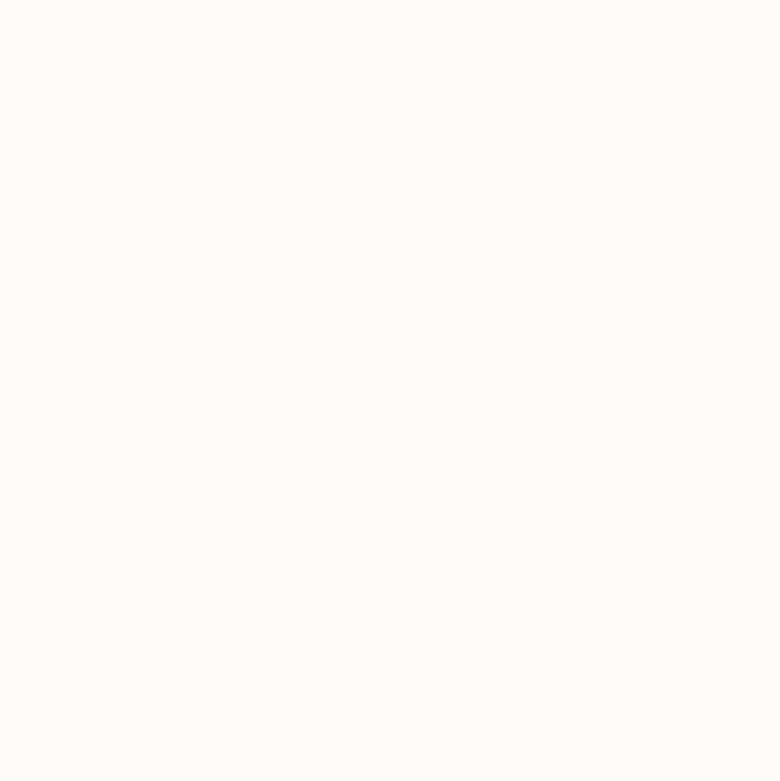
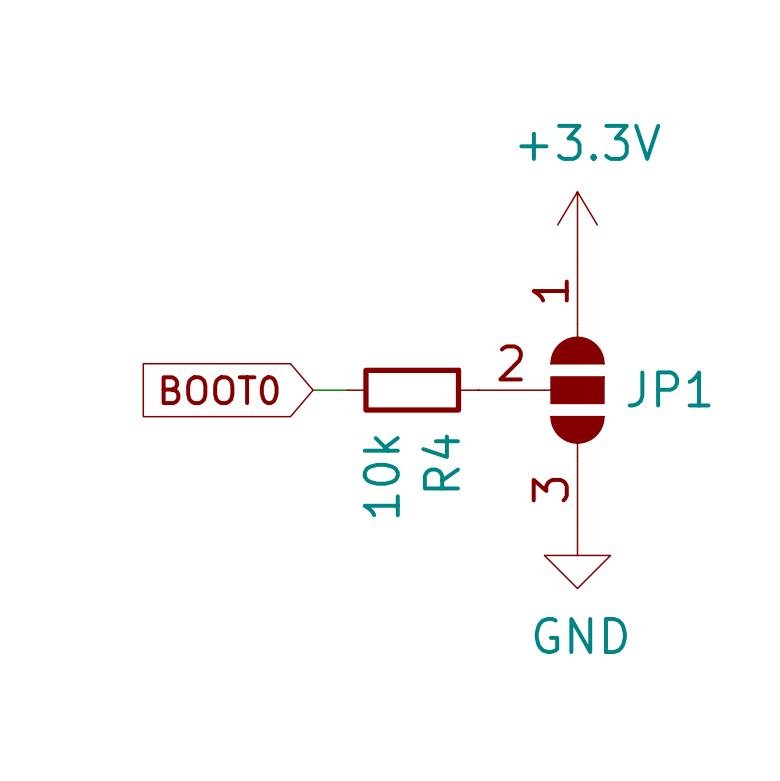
power symbol: none -> +3.3V (577, 224)
global label: none -> BOOT0 (220, 390)
wire: none -> (313, 390) (346, 390)
R4: none -> 10k (412, 390)
JP1: none -> (541, 390)
power symbol: none -> GND (577, 555)

